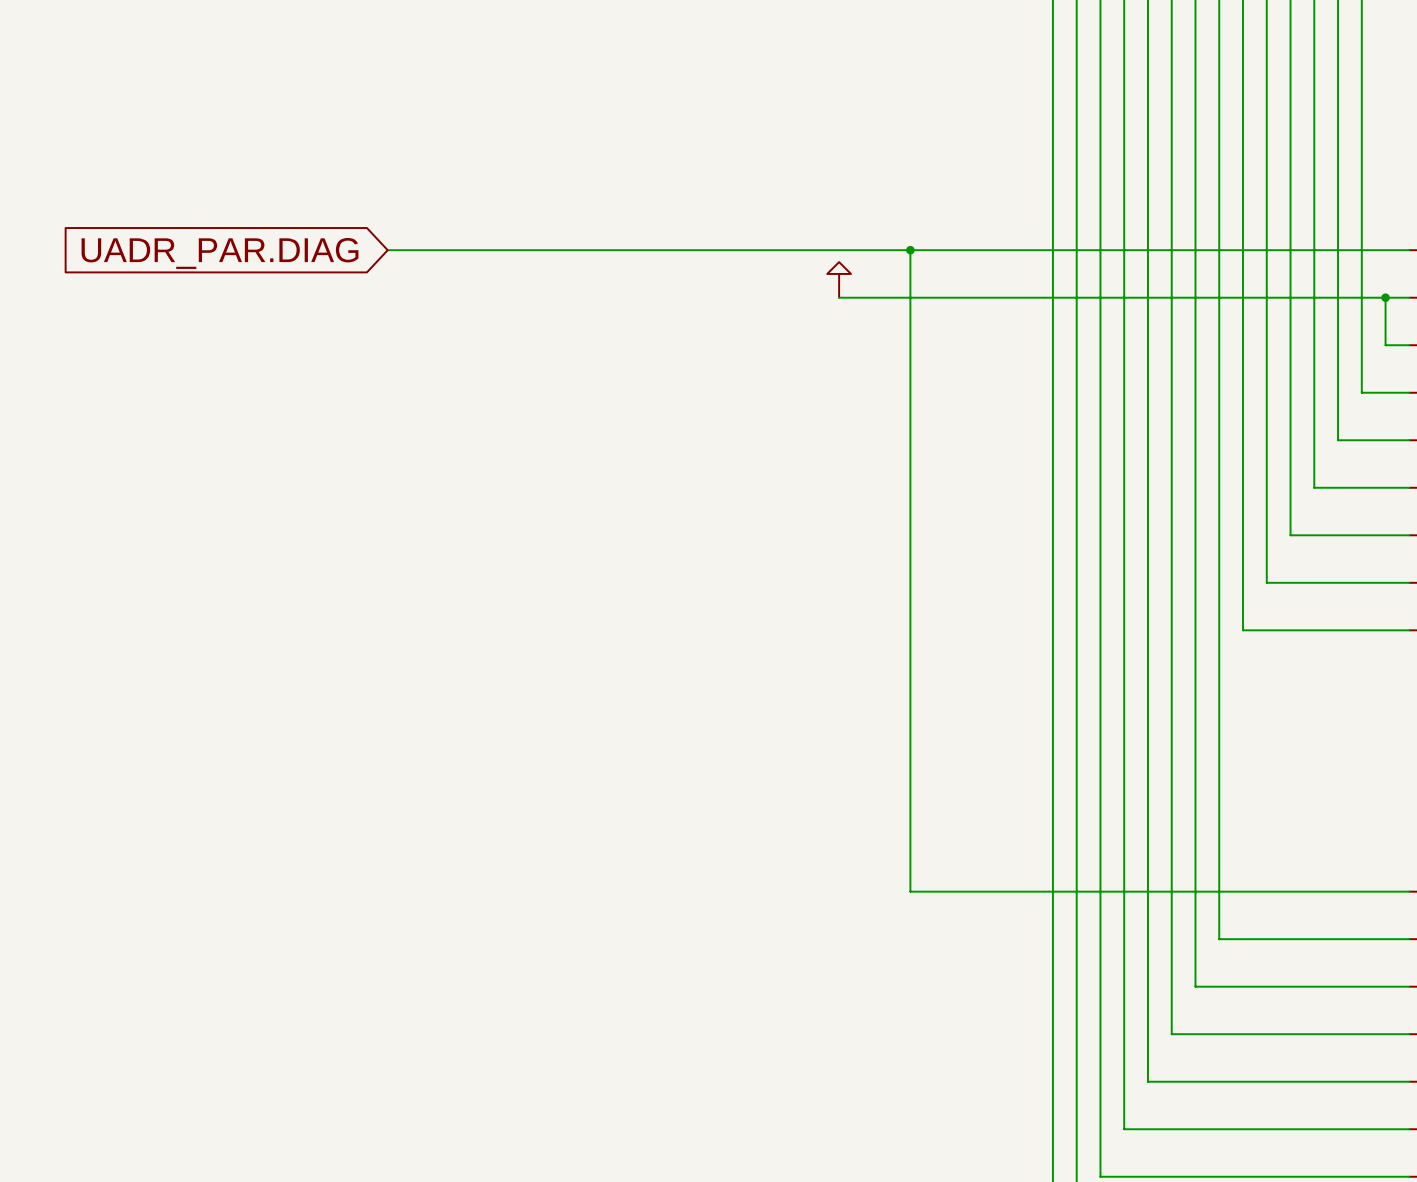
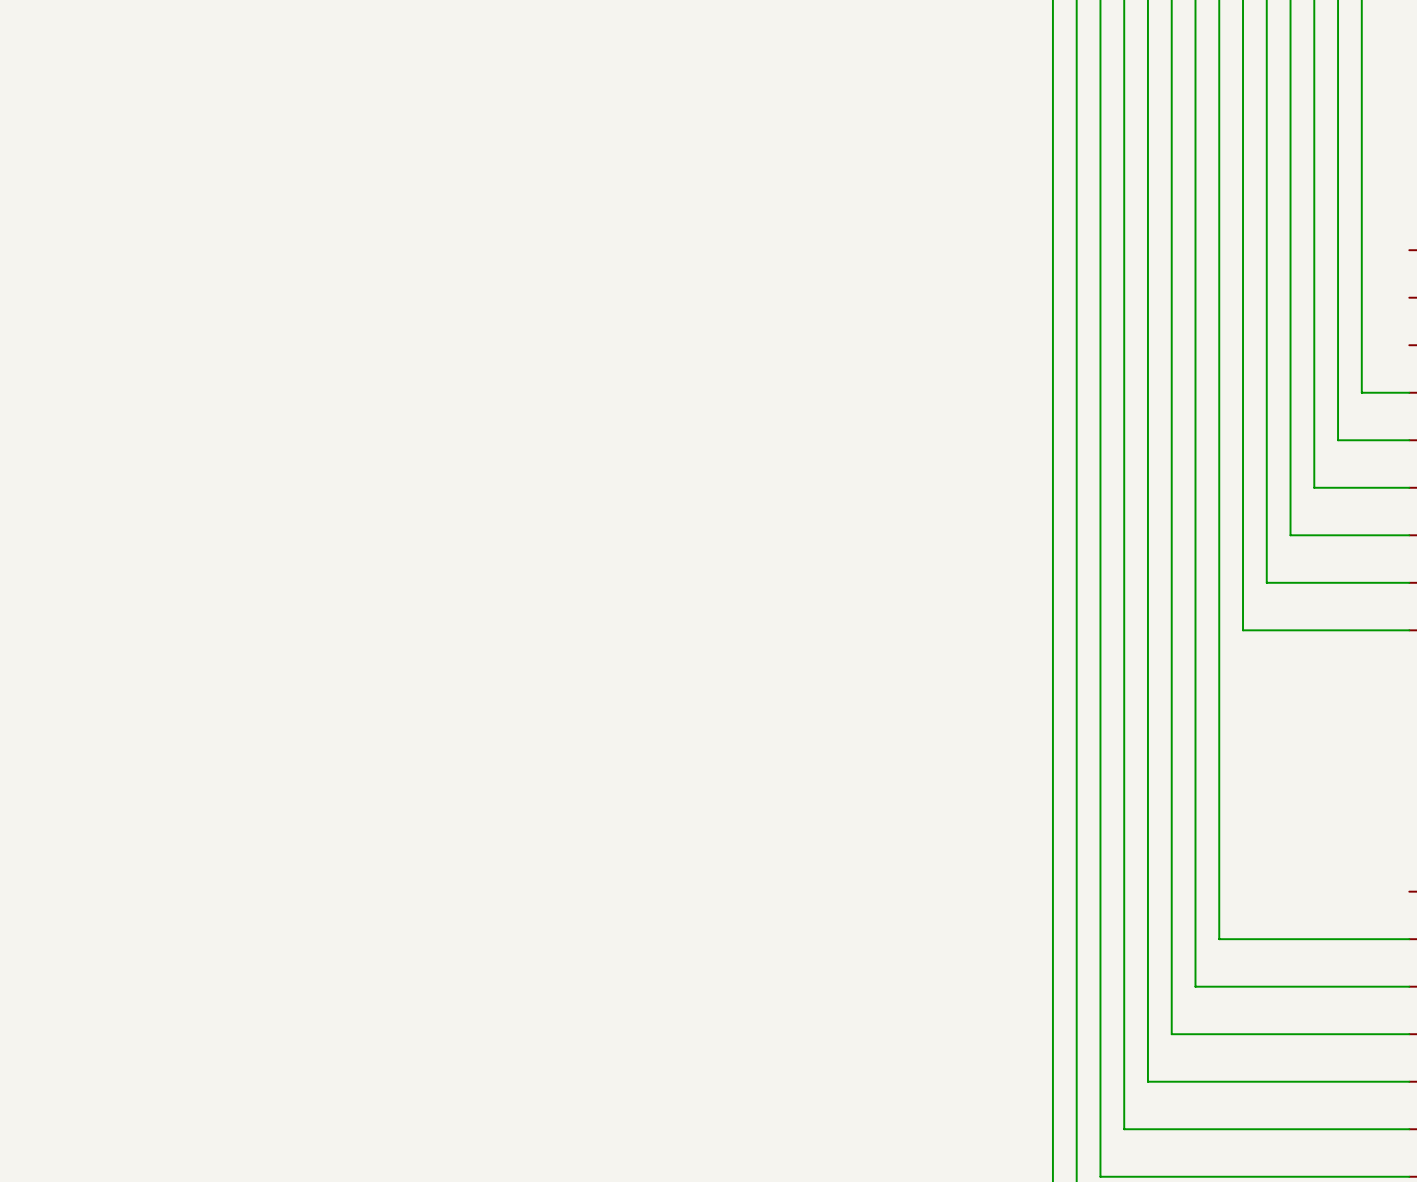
wire: (387, 250) (1409, 250) -> none
wire: (910, 250) (910, 891) (1409, 891) -> none
junction: (910, 250) -> none
global label: UADR_PAR.DIAG (219, 253) -> none
power symbol: (839, 279) -> none
wire: (839, 297) (1409, 297) -> none
wire: (1385, 297) (1385, 345) (1409, 345) -> none
junction: (1385, 297) -> none

